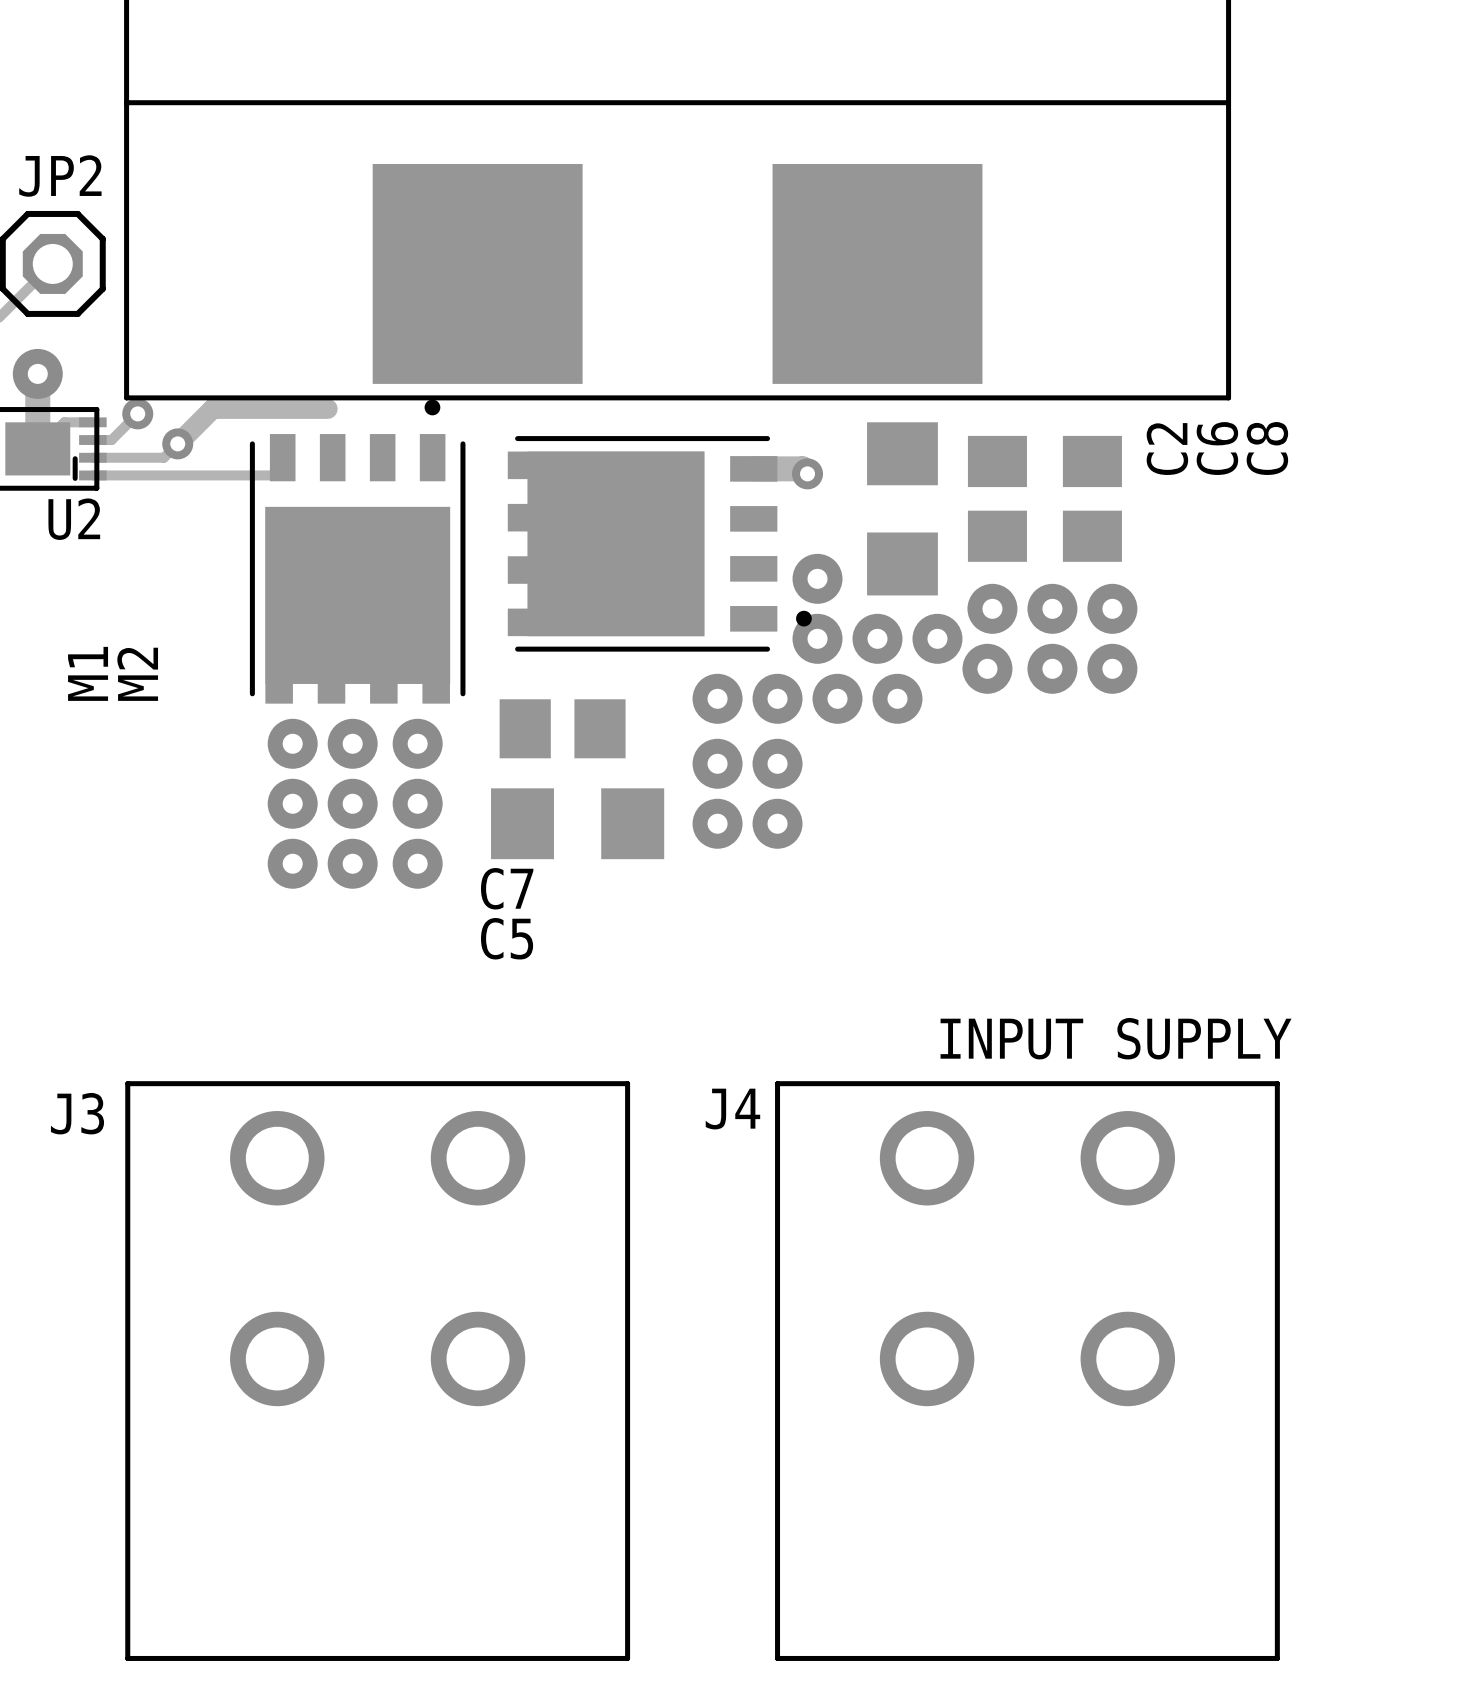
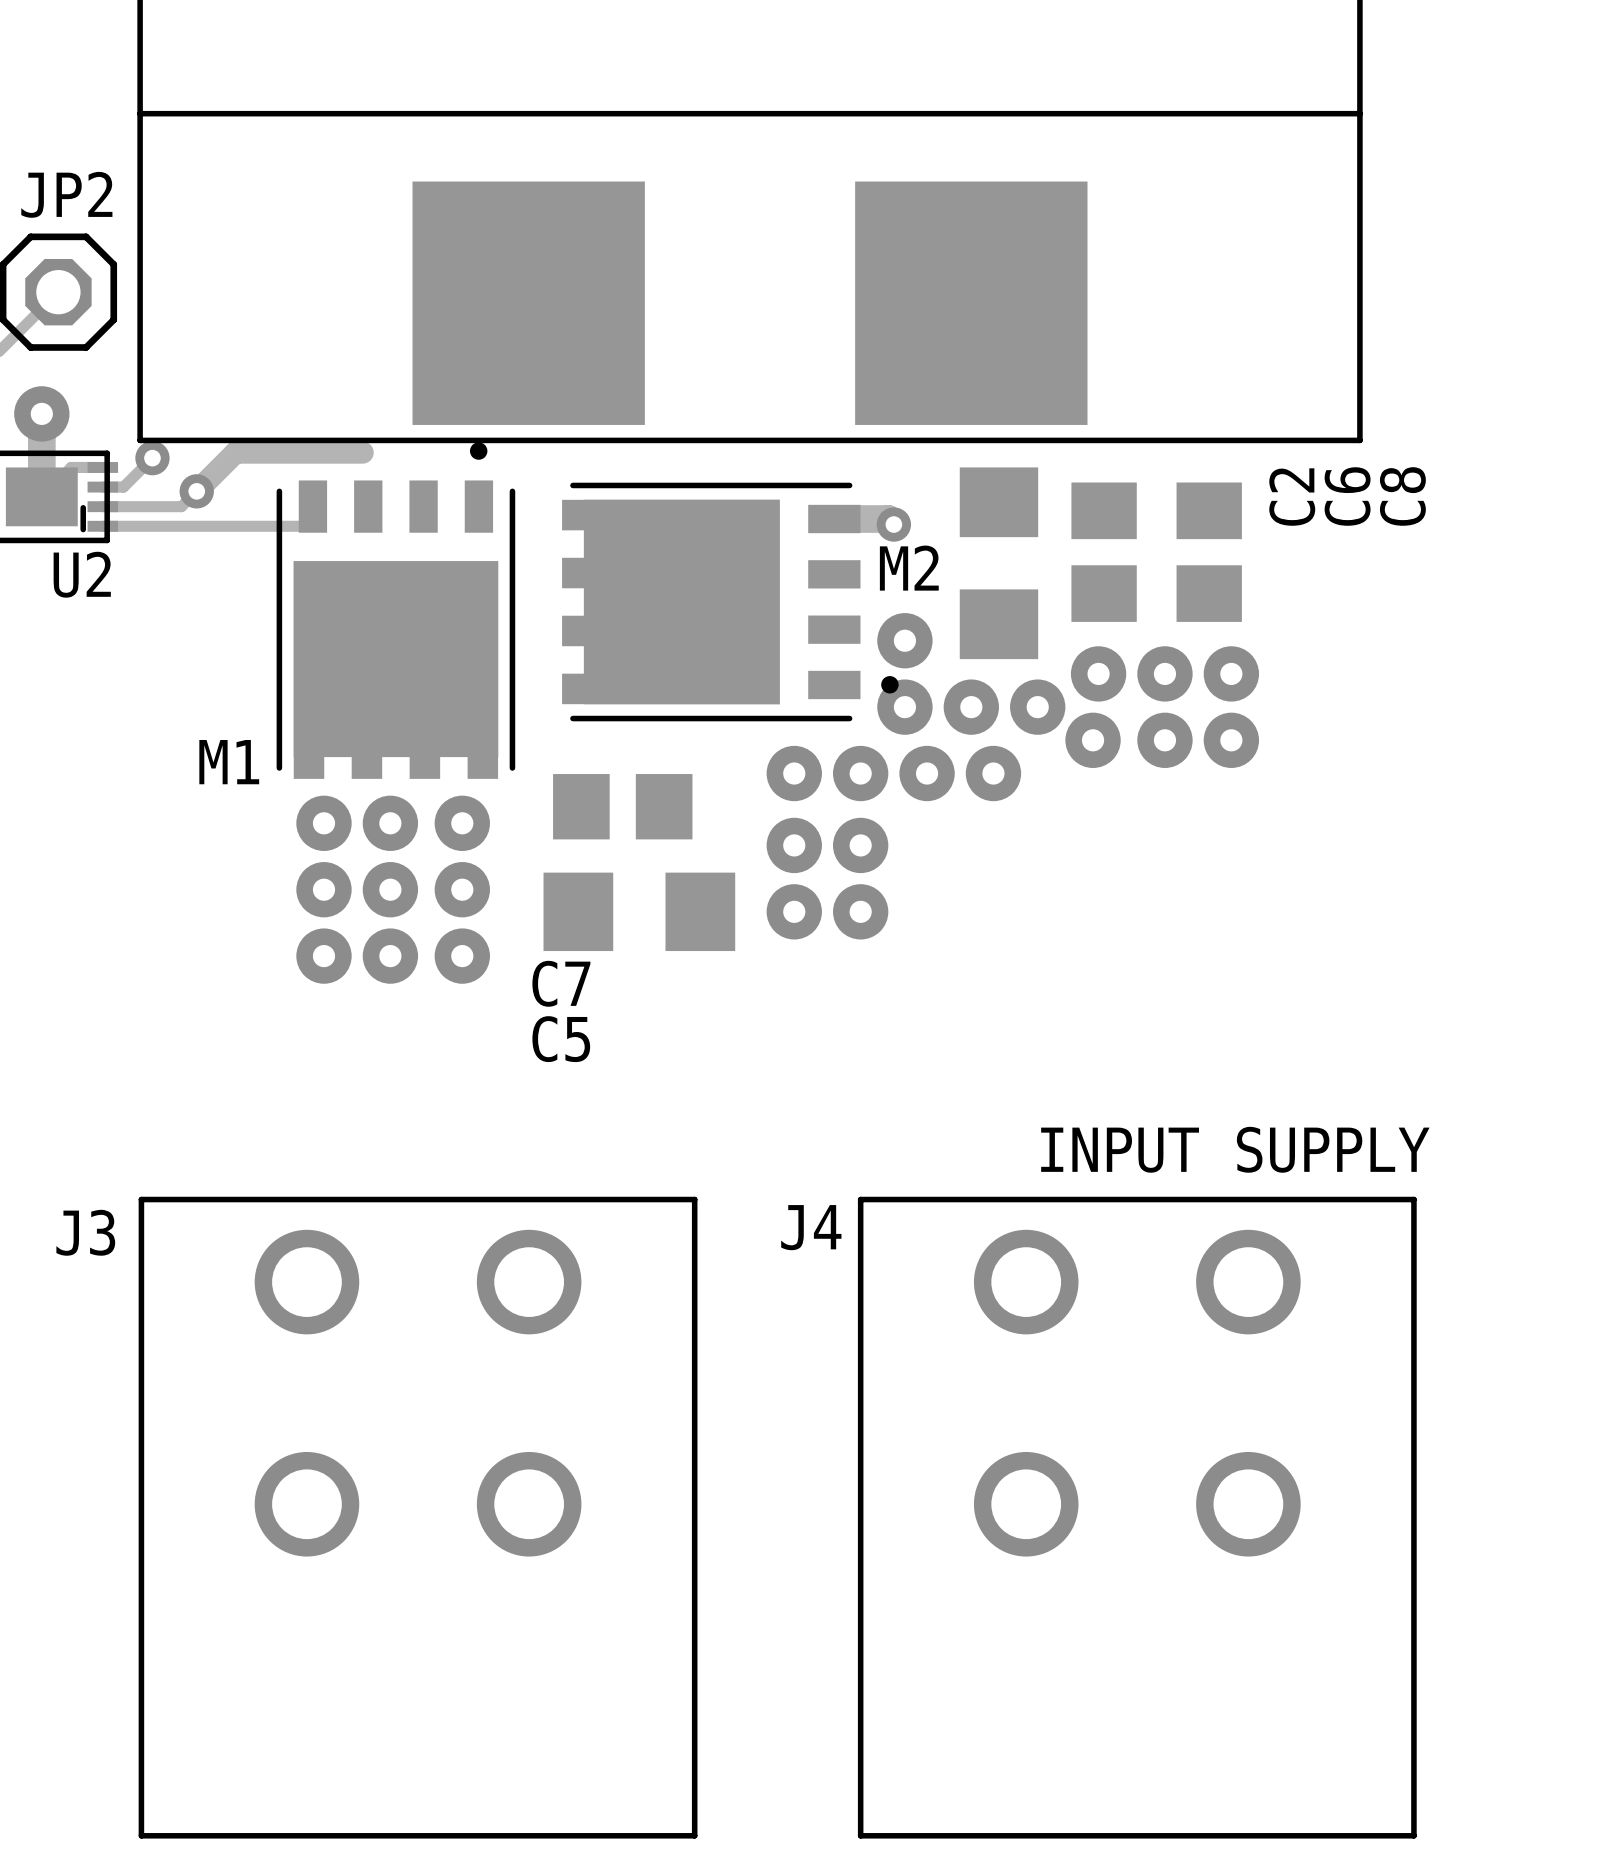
M1 name rotation: 0° (88, 673) -> 90° clockwise (229, 762)
M1 name position: M1 (88, 673) -> M1 (229, 762)
M2 name rotation: 0° (137, 674) -> 90° clockwise (909, 568)
M2 name position: M2 (137, 674) -> M2 (909, 568)

